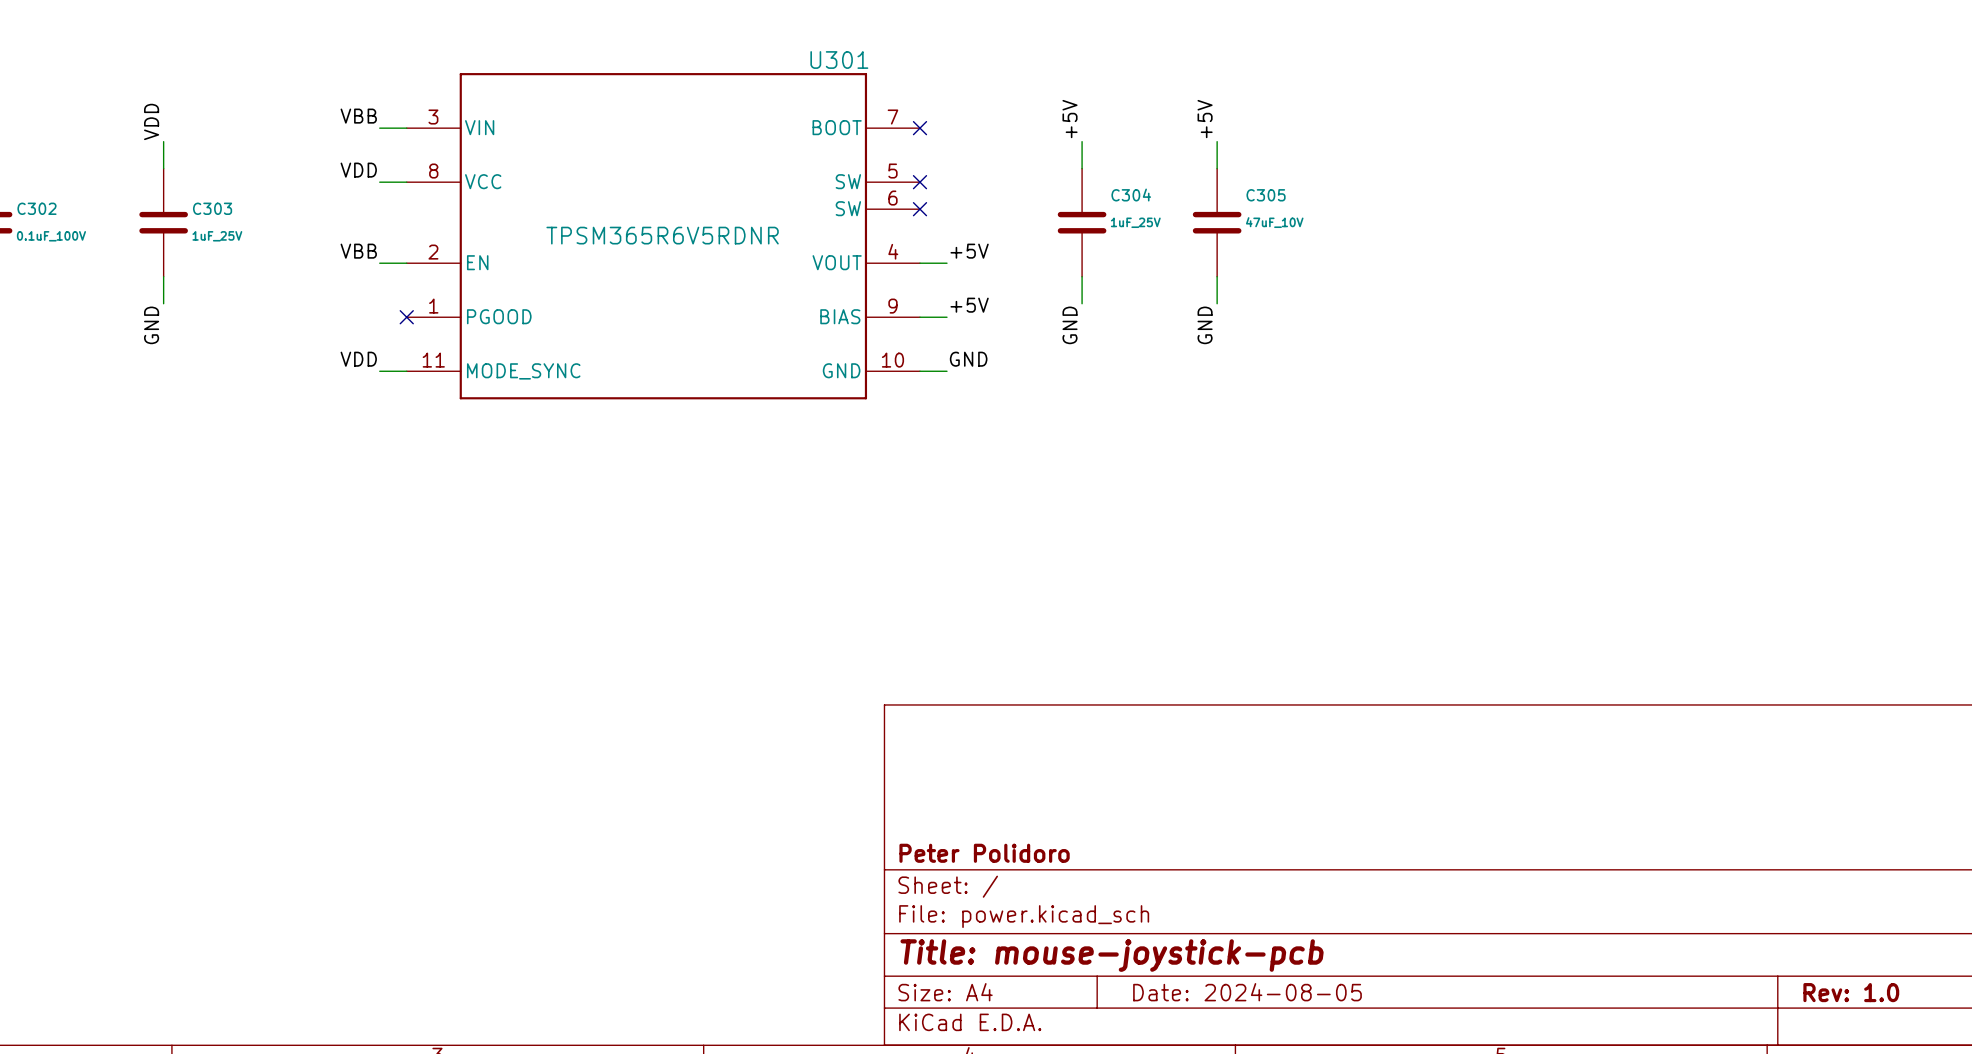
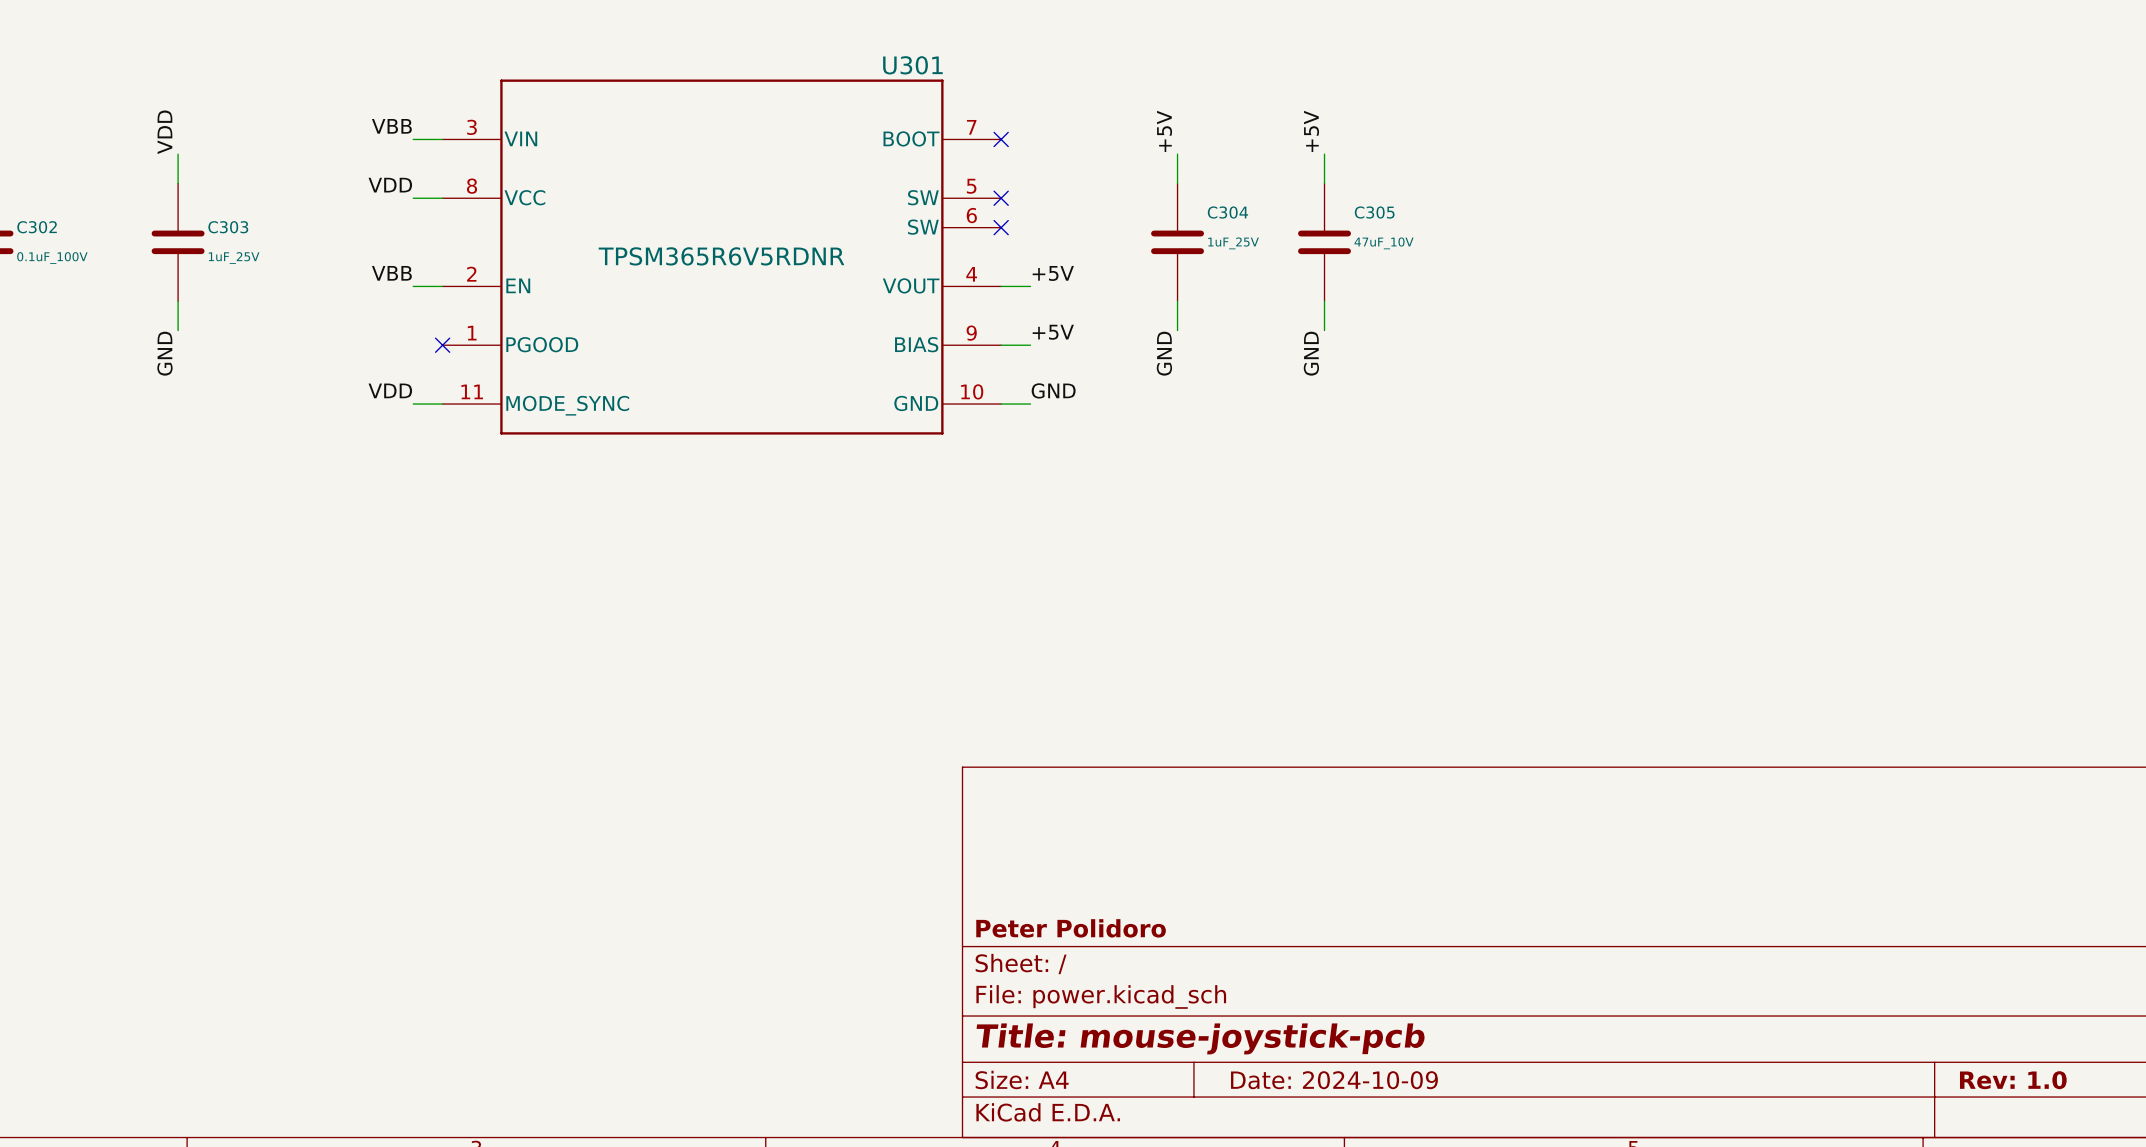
title block: Date: 2024-08-05 (1247, 992) -> Date: 2024-10-09 (1334, 1080)

